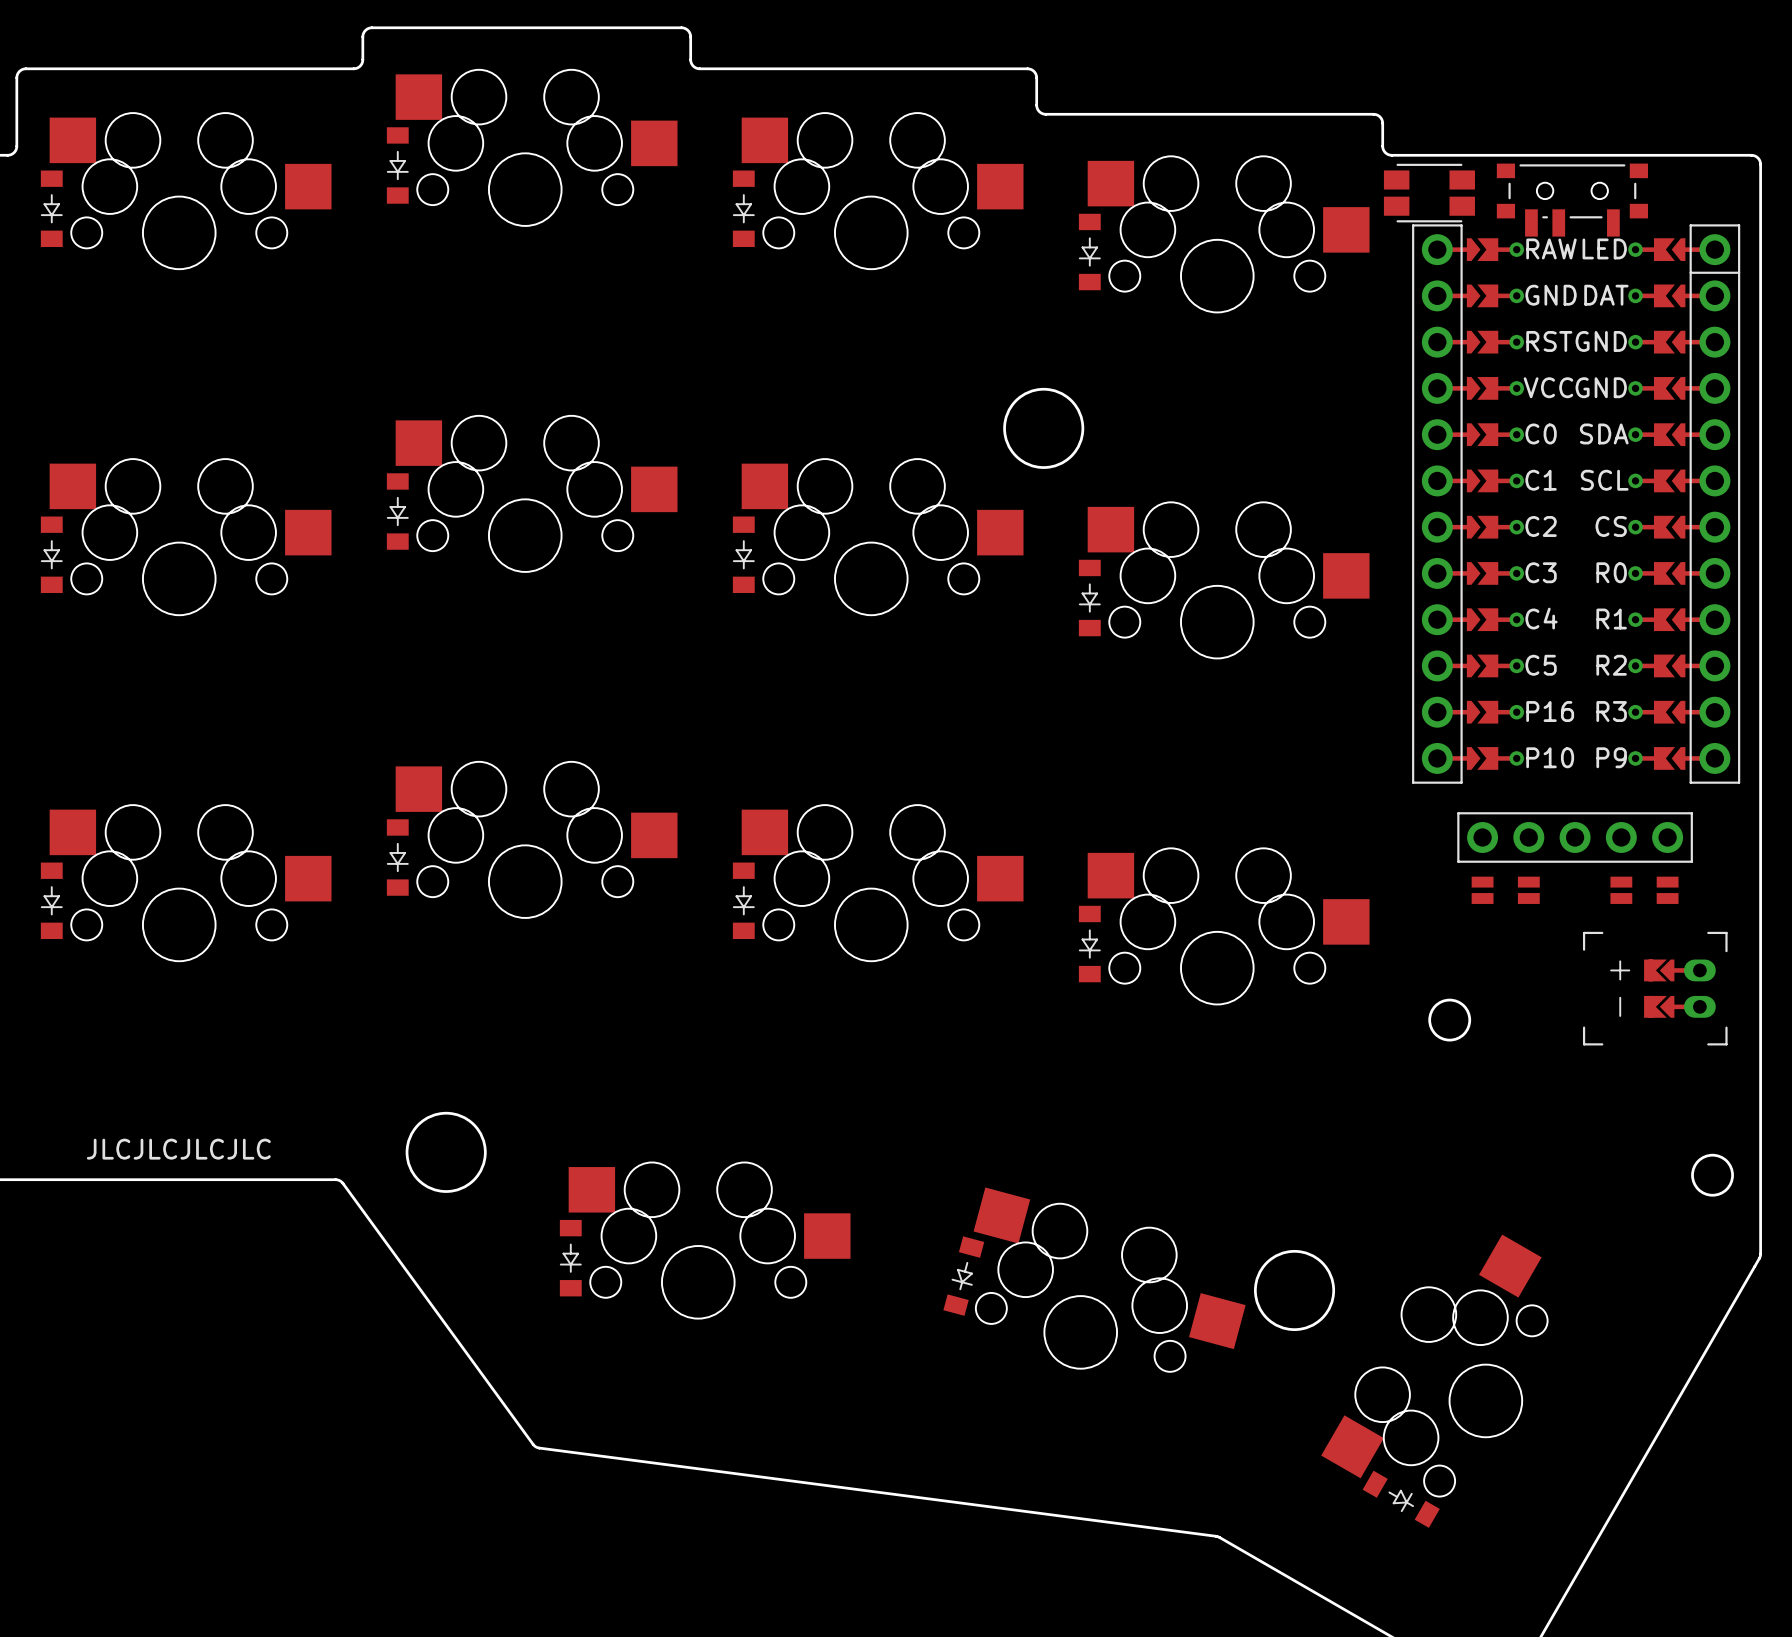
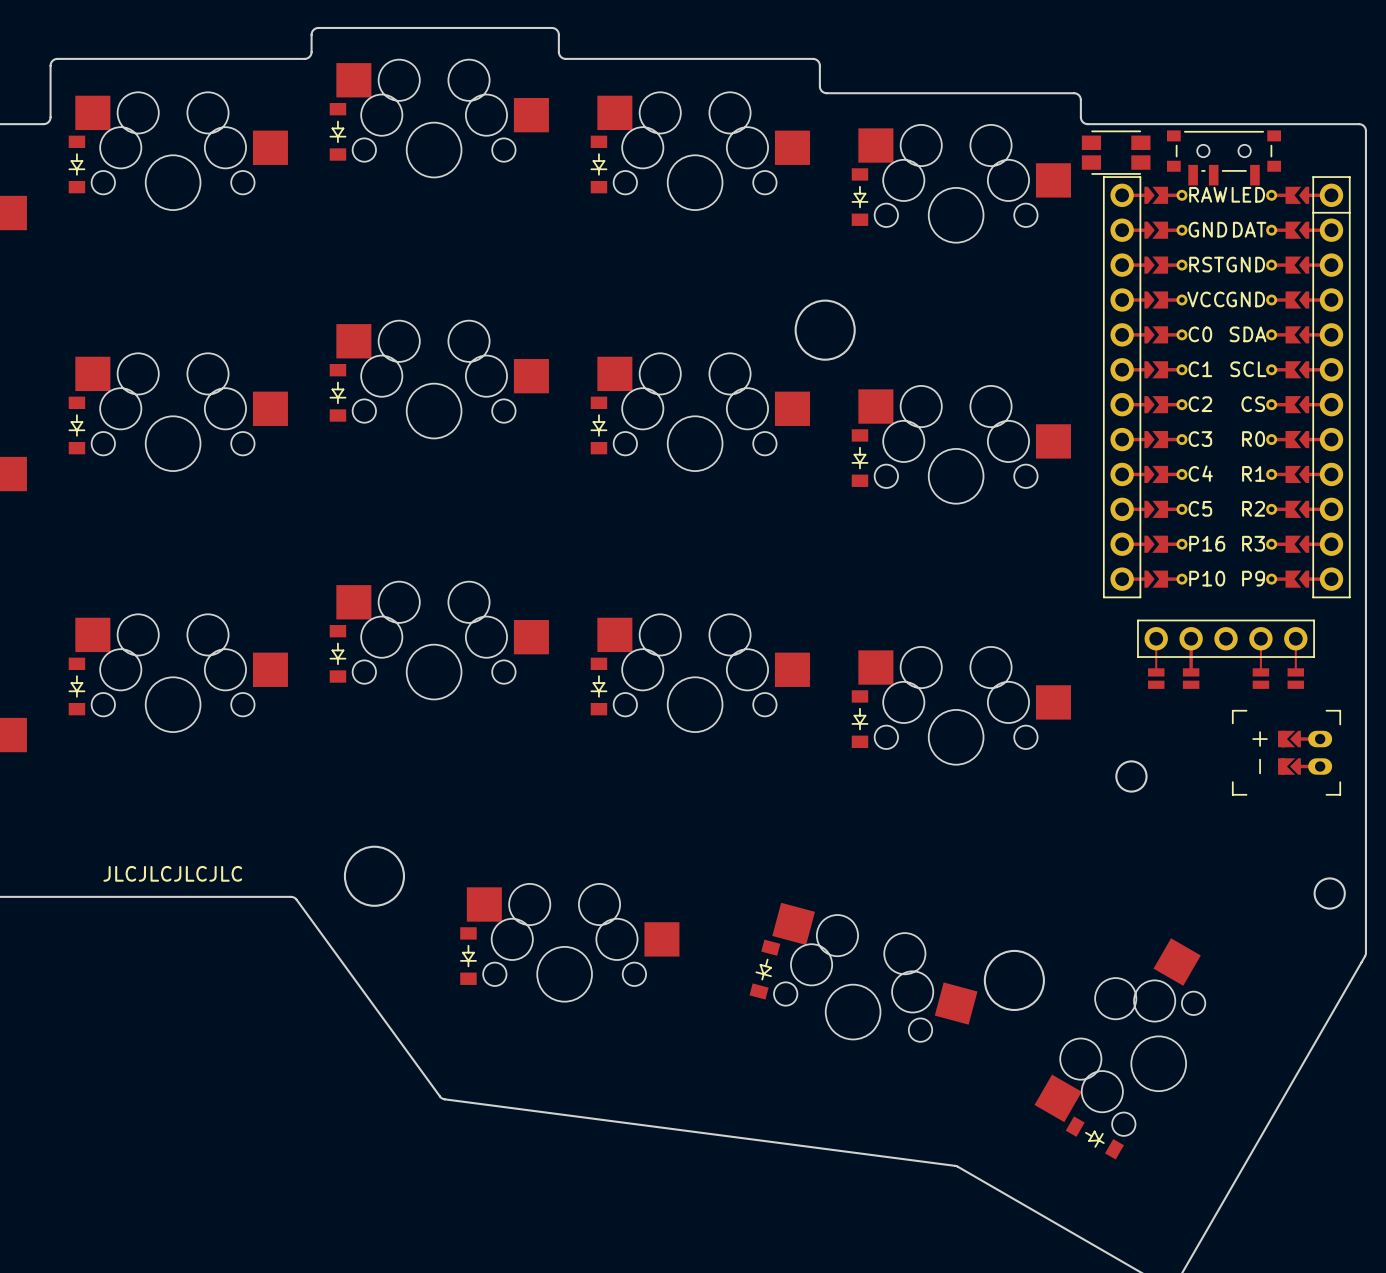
track: none -> (1156, 638) (1156, 672)
track: none -> (1191, 638) (1191, 672)
track: none -> (1260, 638) (1260, 672)
track: none -> (1295, 638) (1295, 672)

